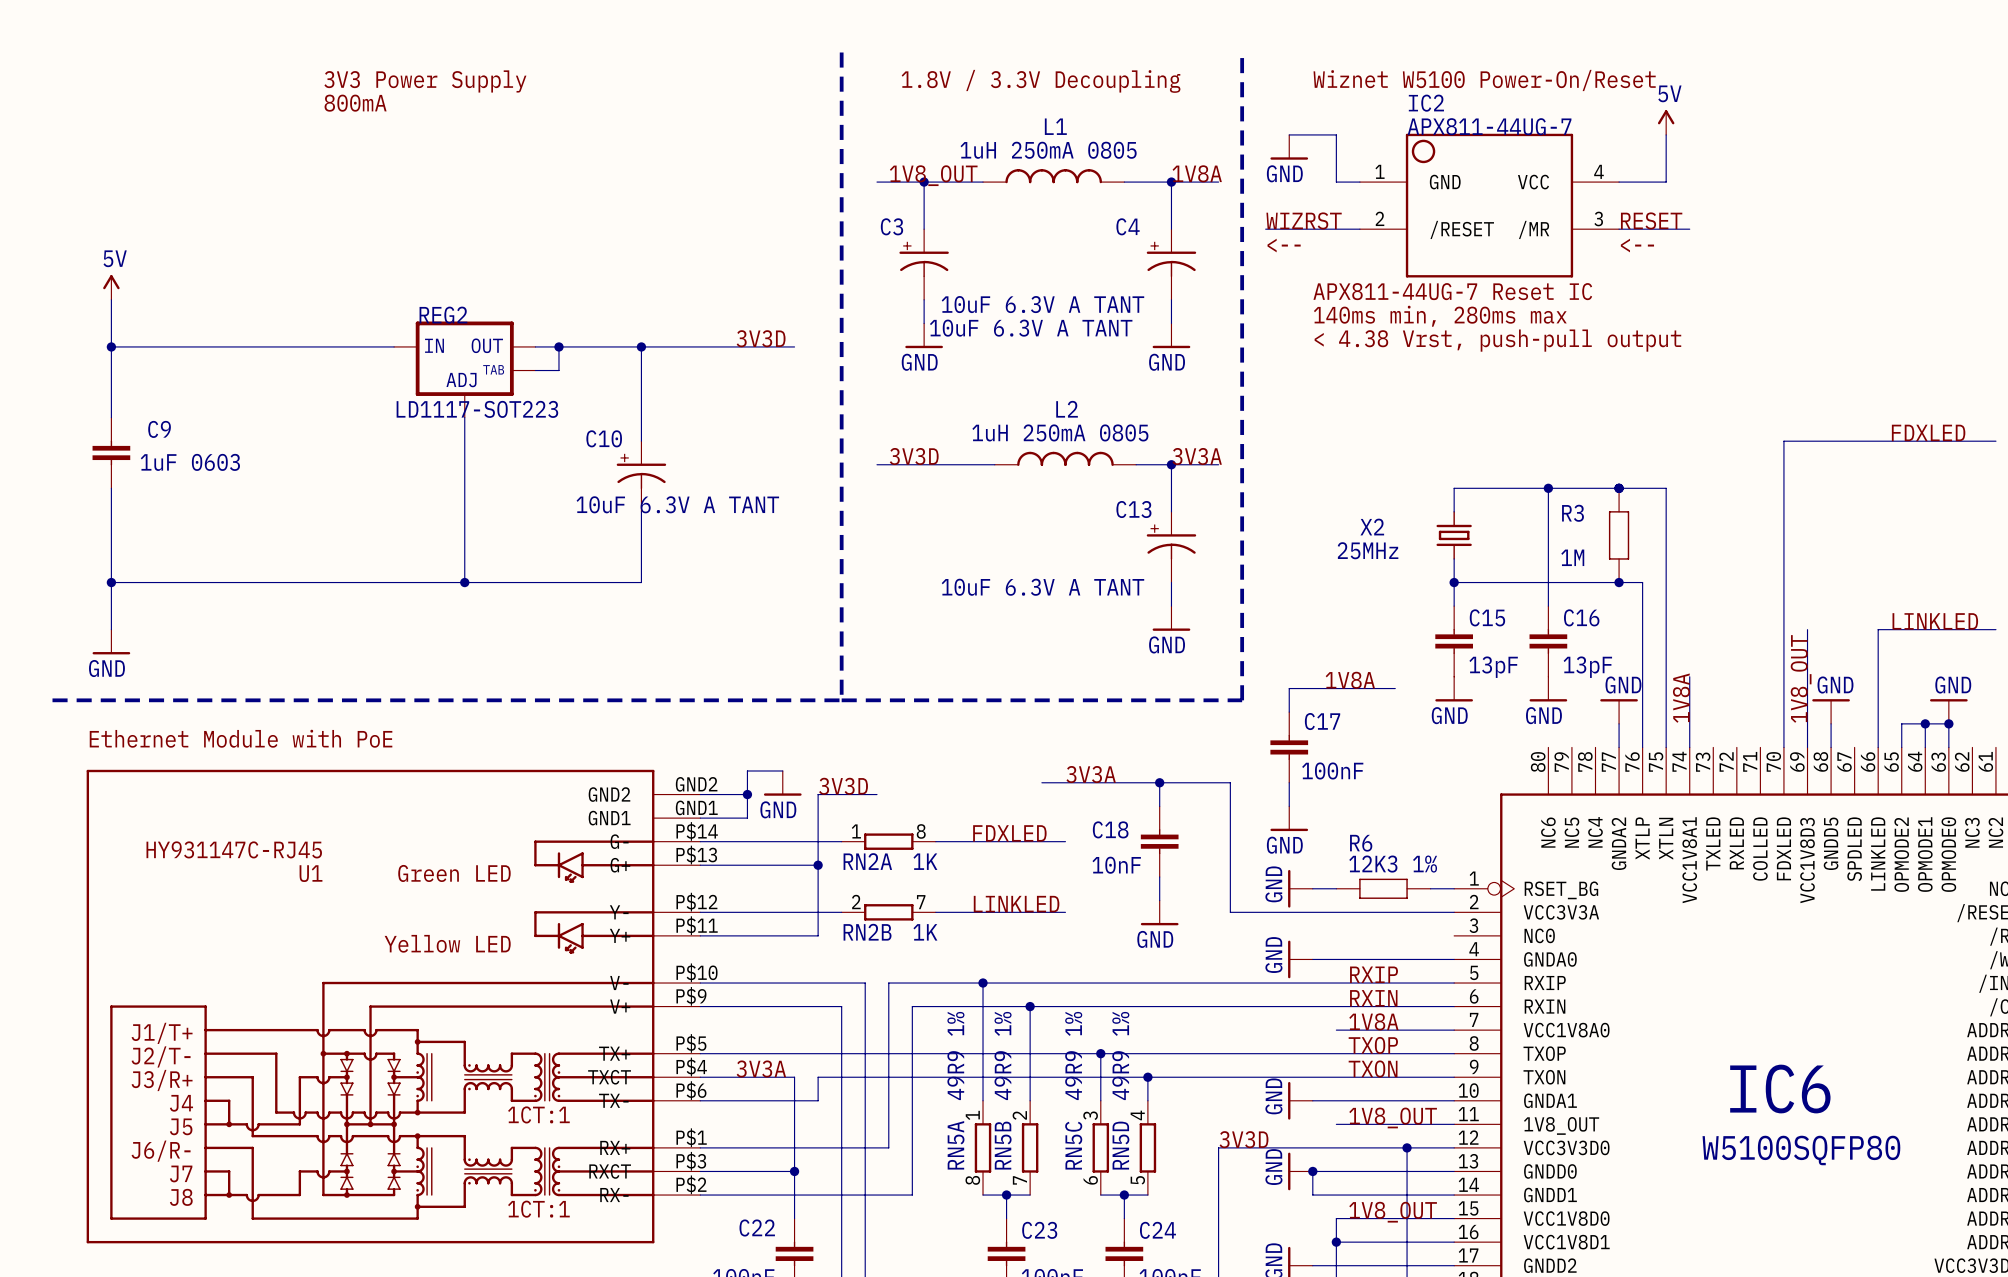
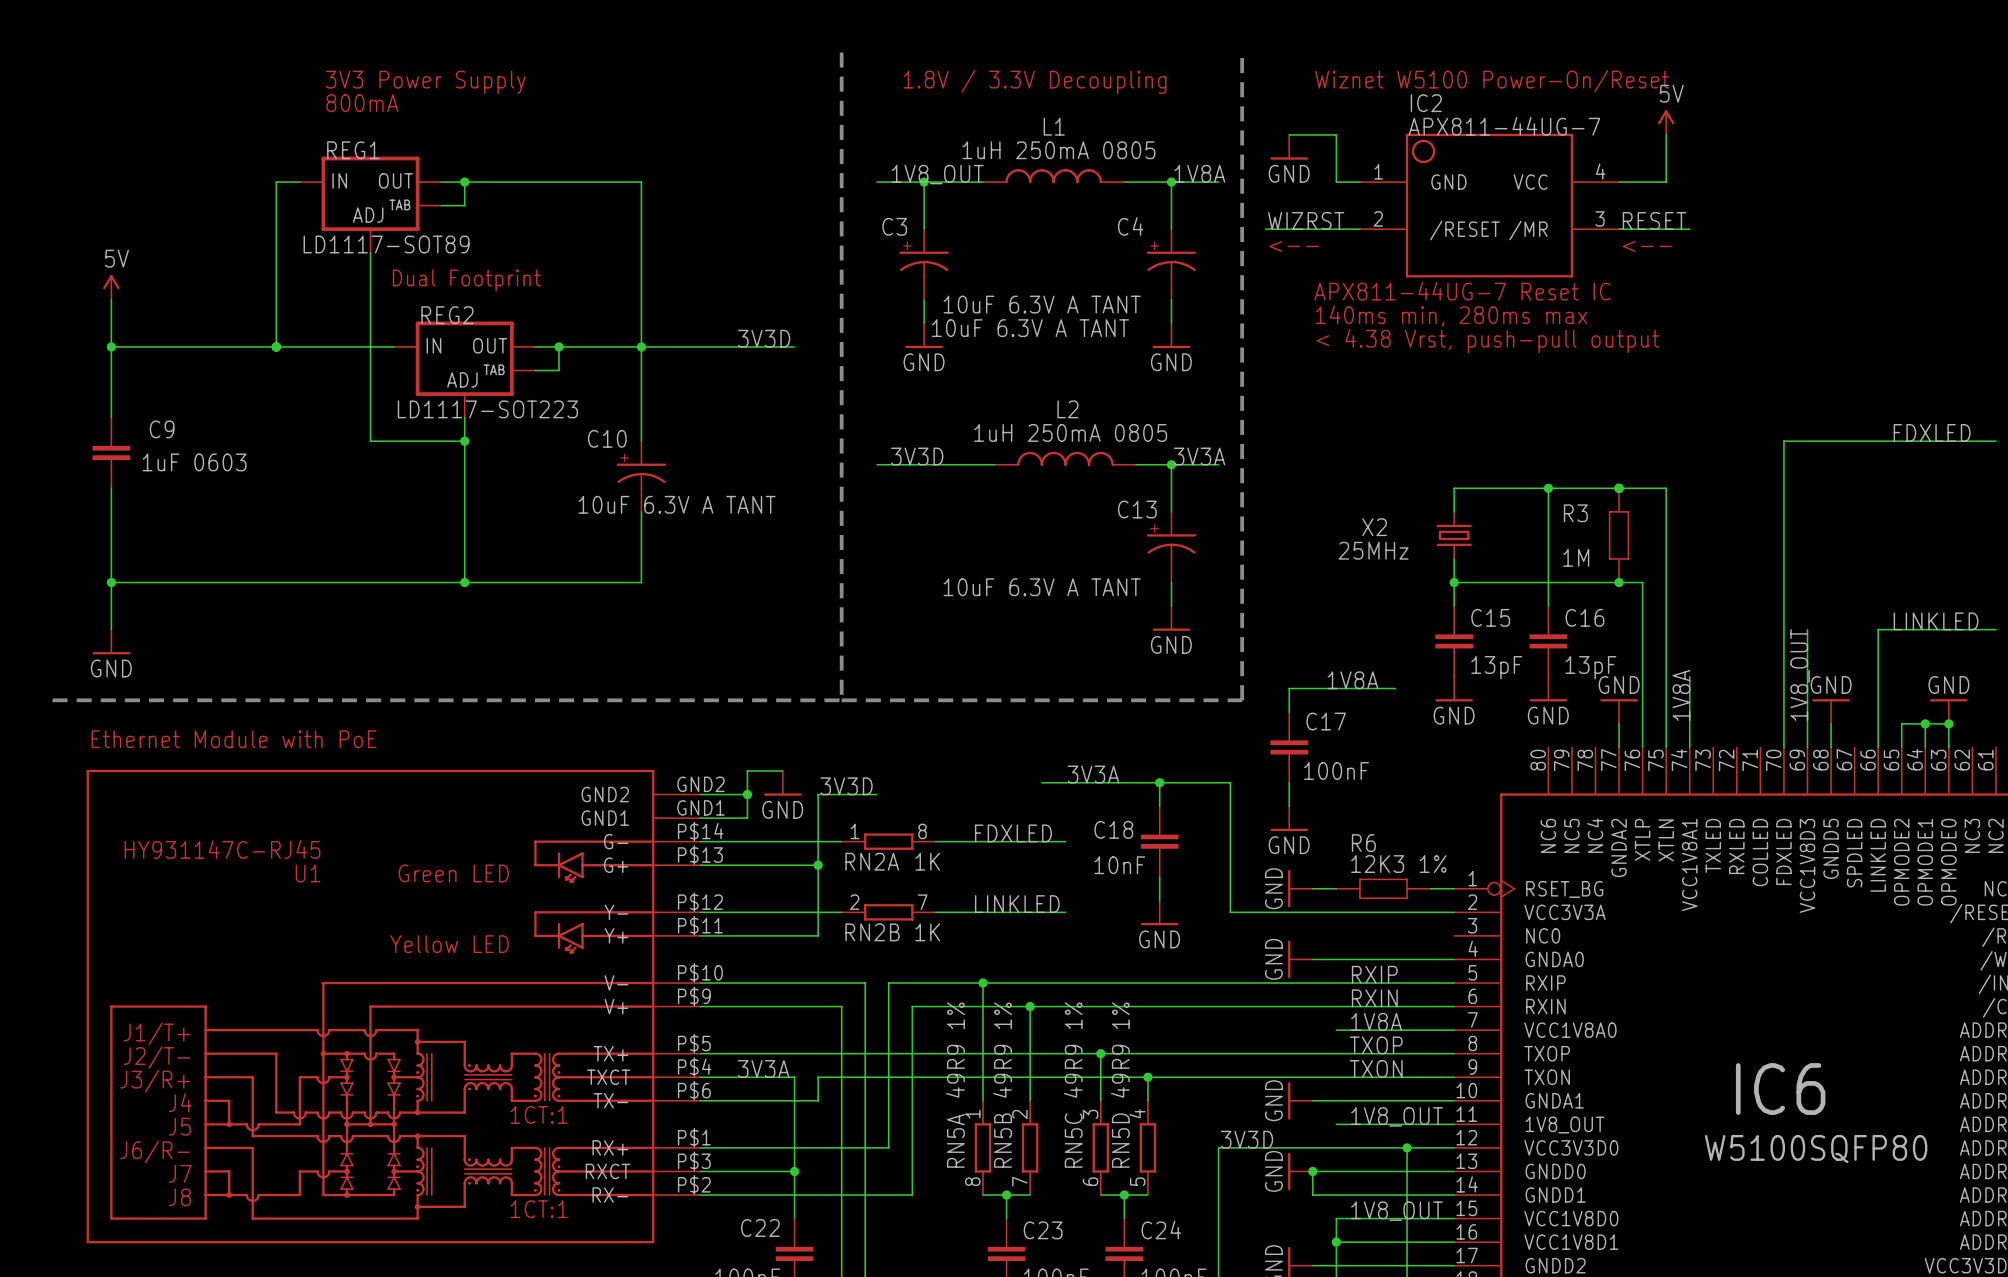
wire: none -> (299, 182) (276, 182) (276, 346)
wire: none -> (441, 182) (641, 182) (641, 346)
wire: none -> (464, 182) (464, 205) (441, 205)
junction: none -> (464, 182)
REG1: none -> LD1117-SOT89 (370, 204)
wire: none -> (370, 252) (370, 441) (464, 441)
text: none -> Dual Footprint (466, 280)
junction: none -> (276, 346)
junction: none -> (464, 441)

